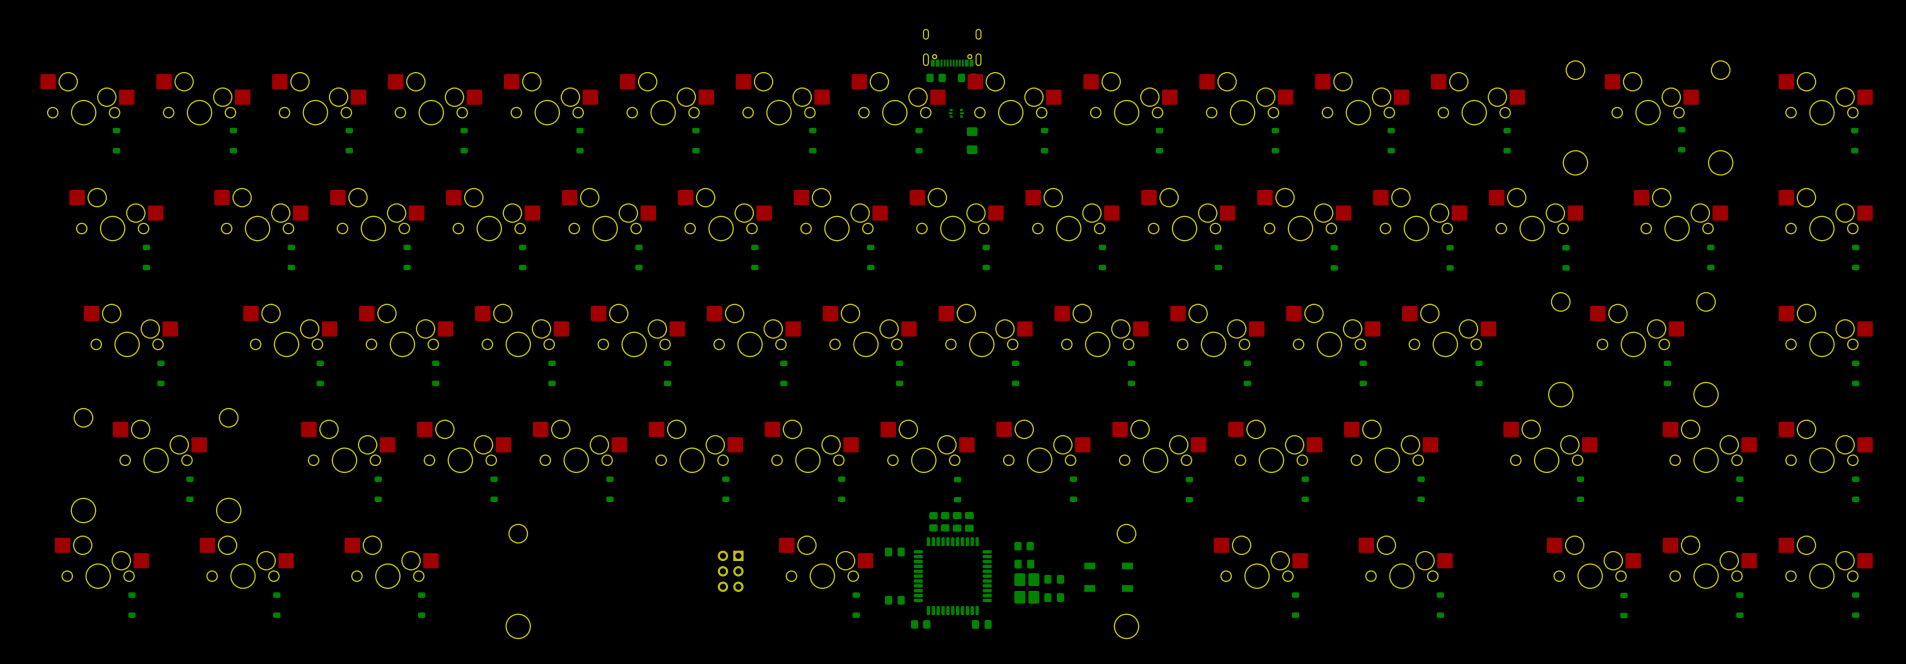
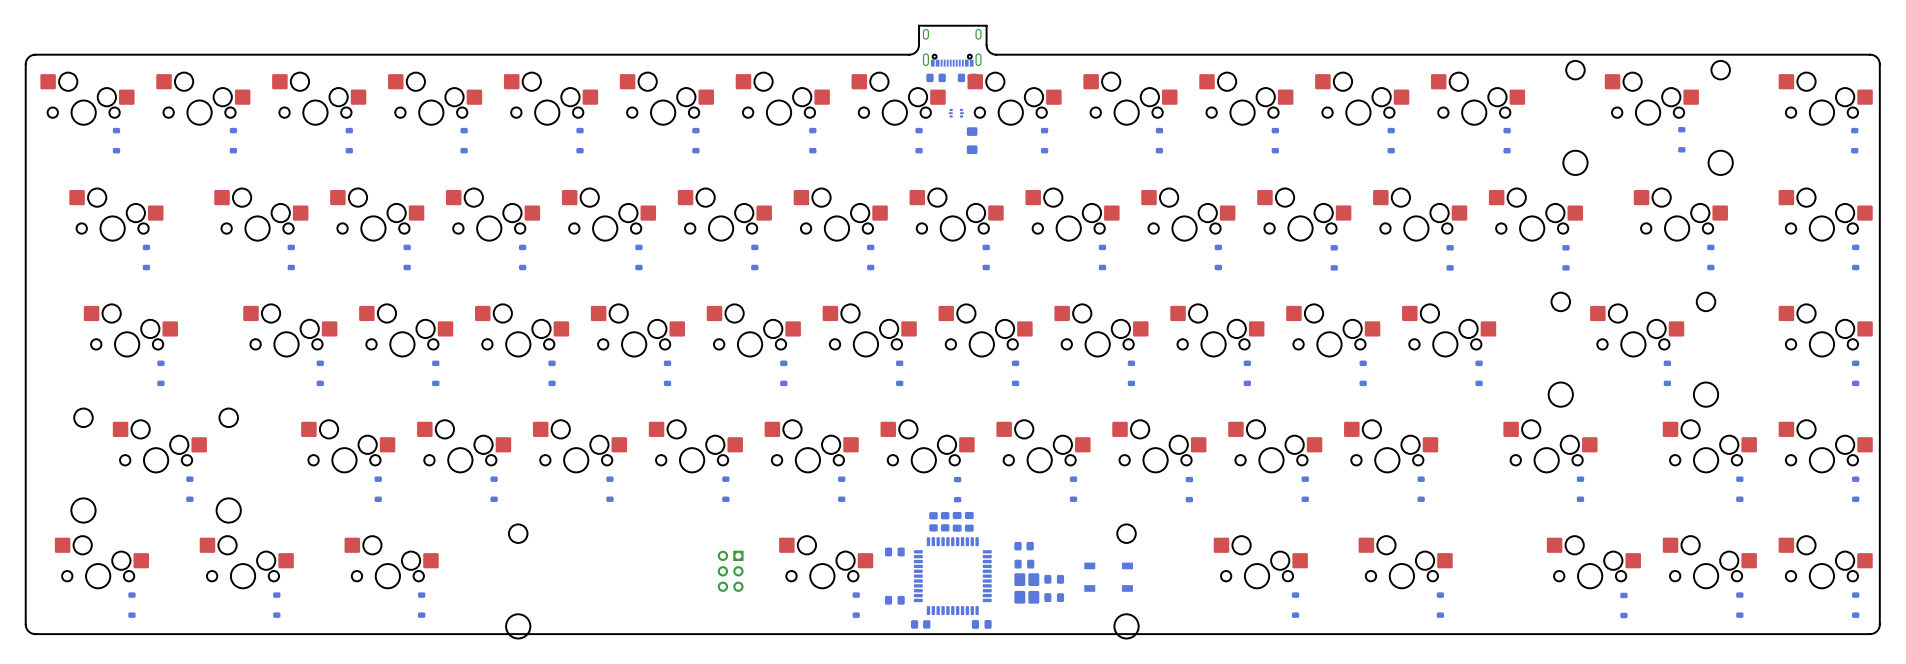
board edge: none -> (918, 25) (918, 47) (915, 52) (909, 54) (35, 54) (29, 56) (25, 64) (25, 624) (27, 630) (35, 634) (1870, 634) (1878, 629) (1879, 64) (1875, 55) (996, 54) (990, 52) (986, 47) (986, 25) (918, 25)

